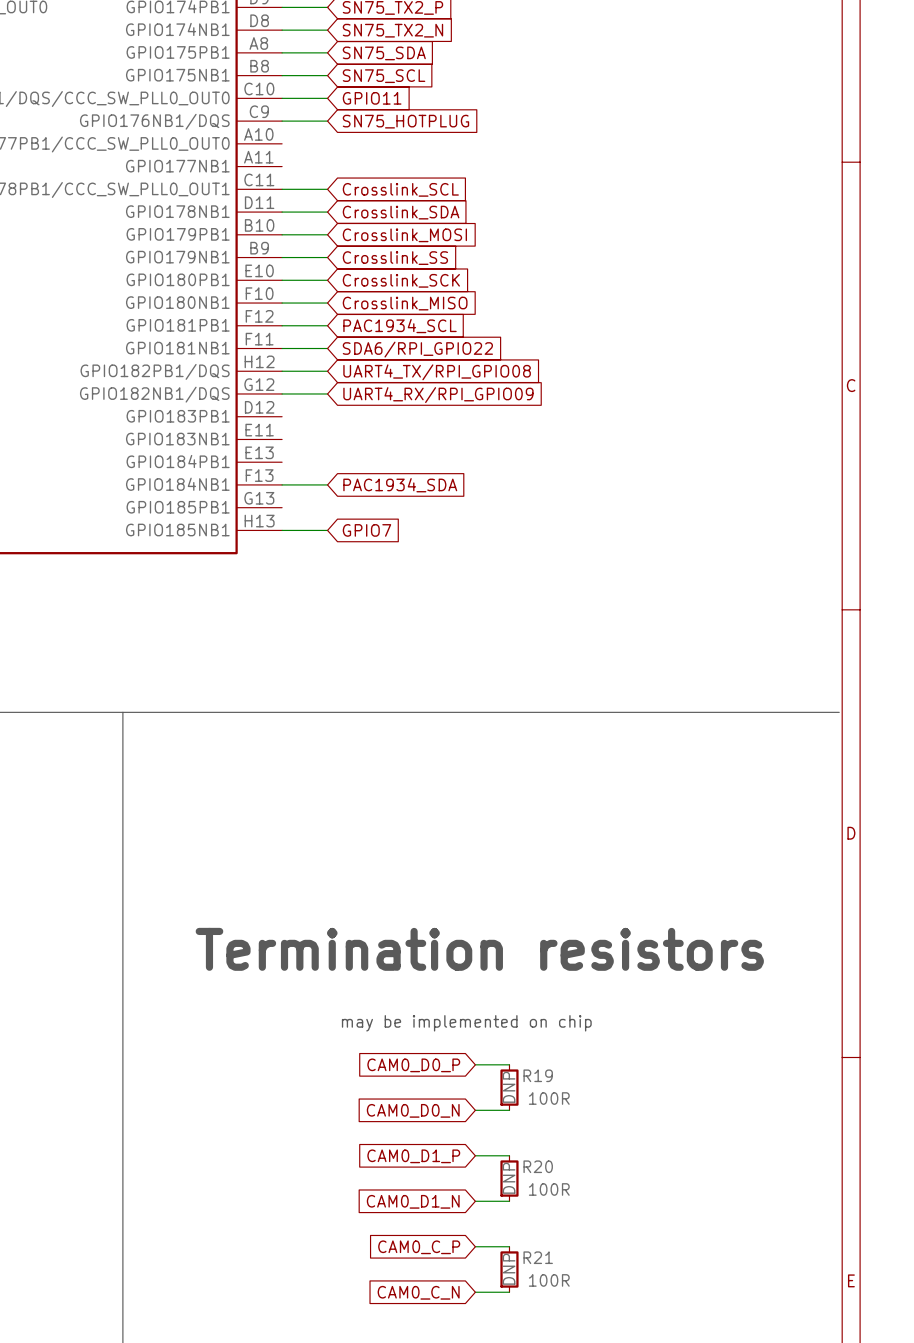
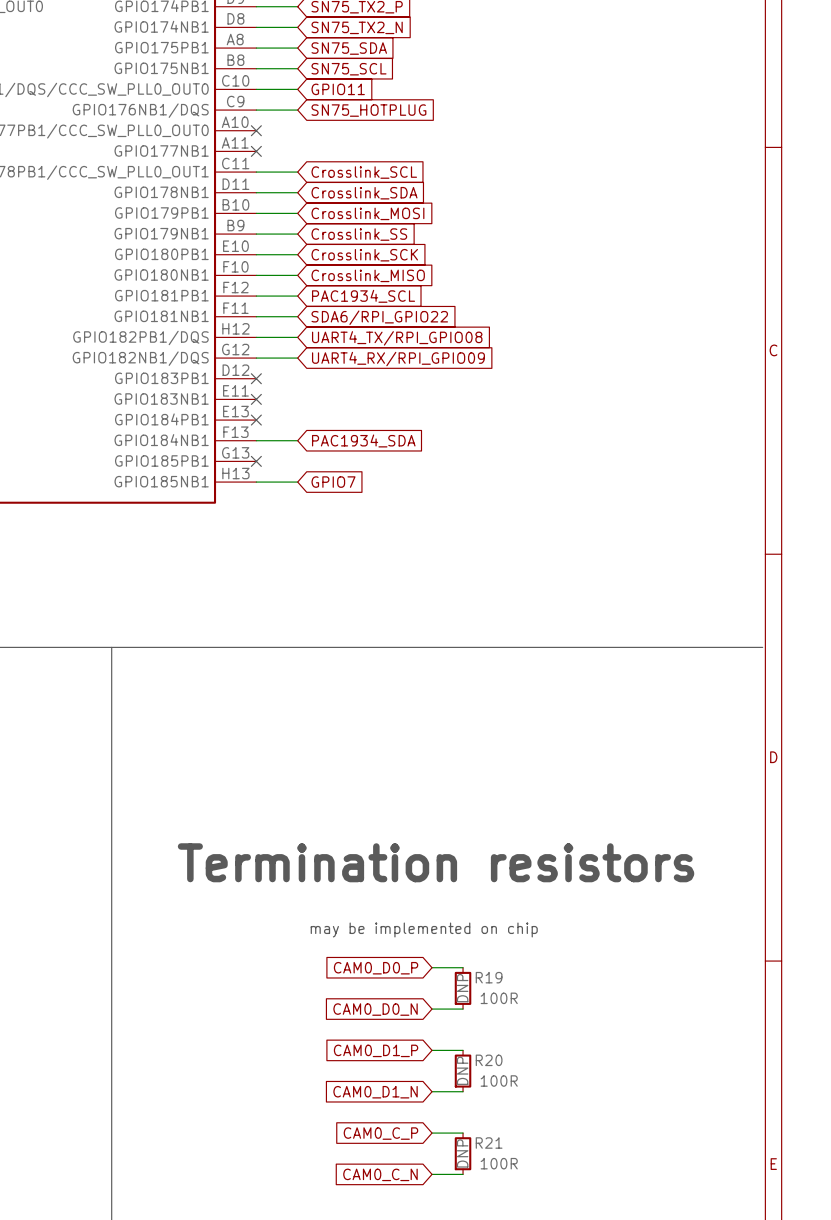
no-connect mark: none -> (256, 130)
no-connect mark: none -> (256, 151)
no-connect mark: none -> (256, 378)
no-connect mark: none -> (256, 399)
no-connect mark: none -> (256, 420)
no-connect mark: none -> (256, 461)

